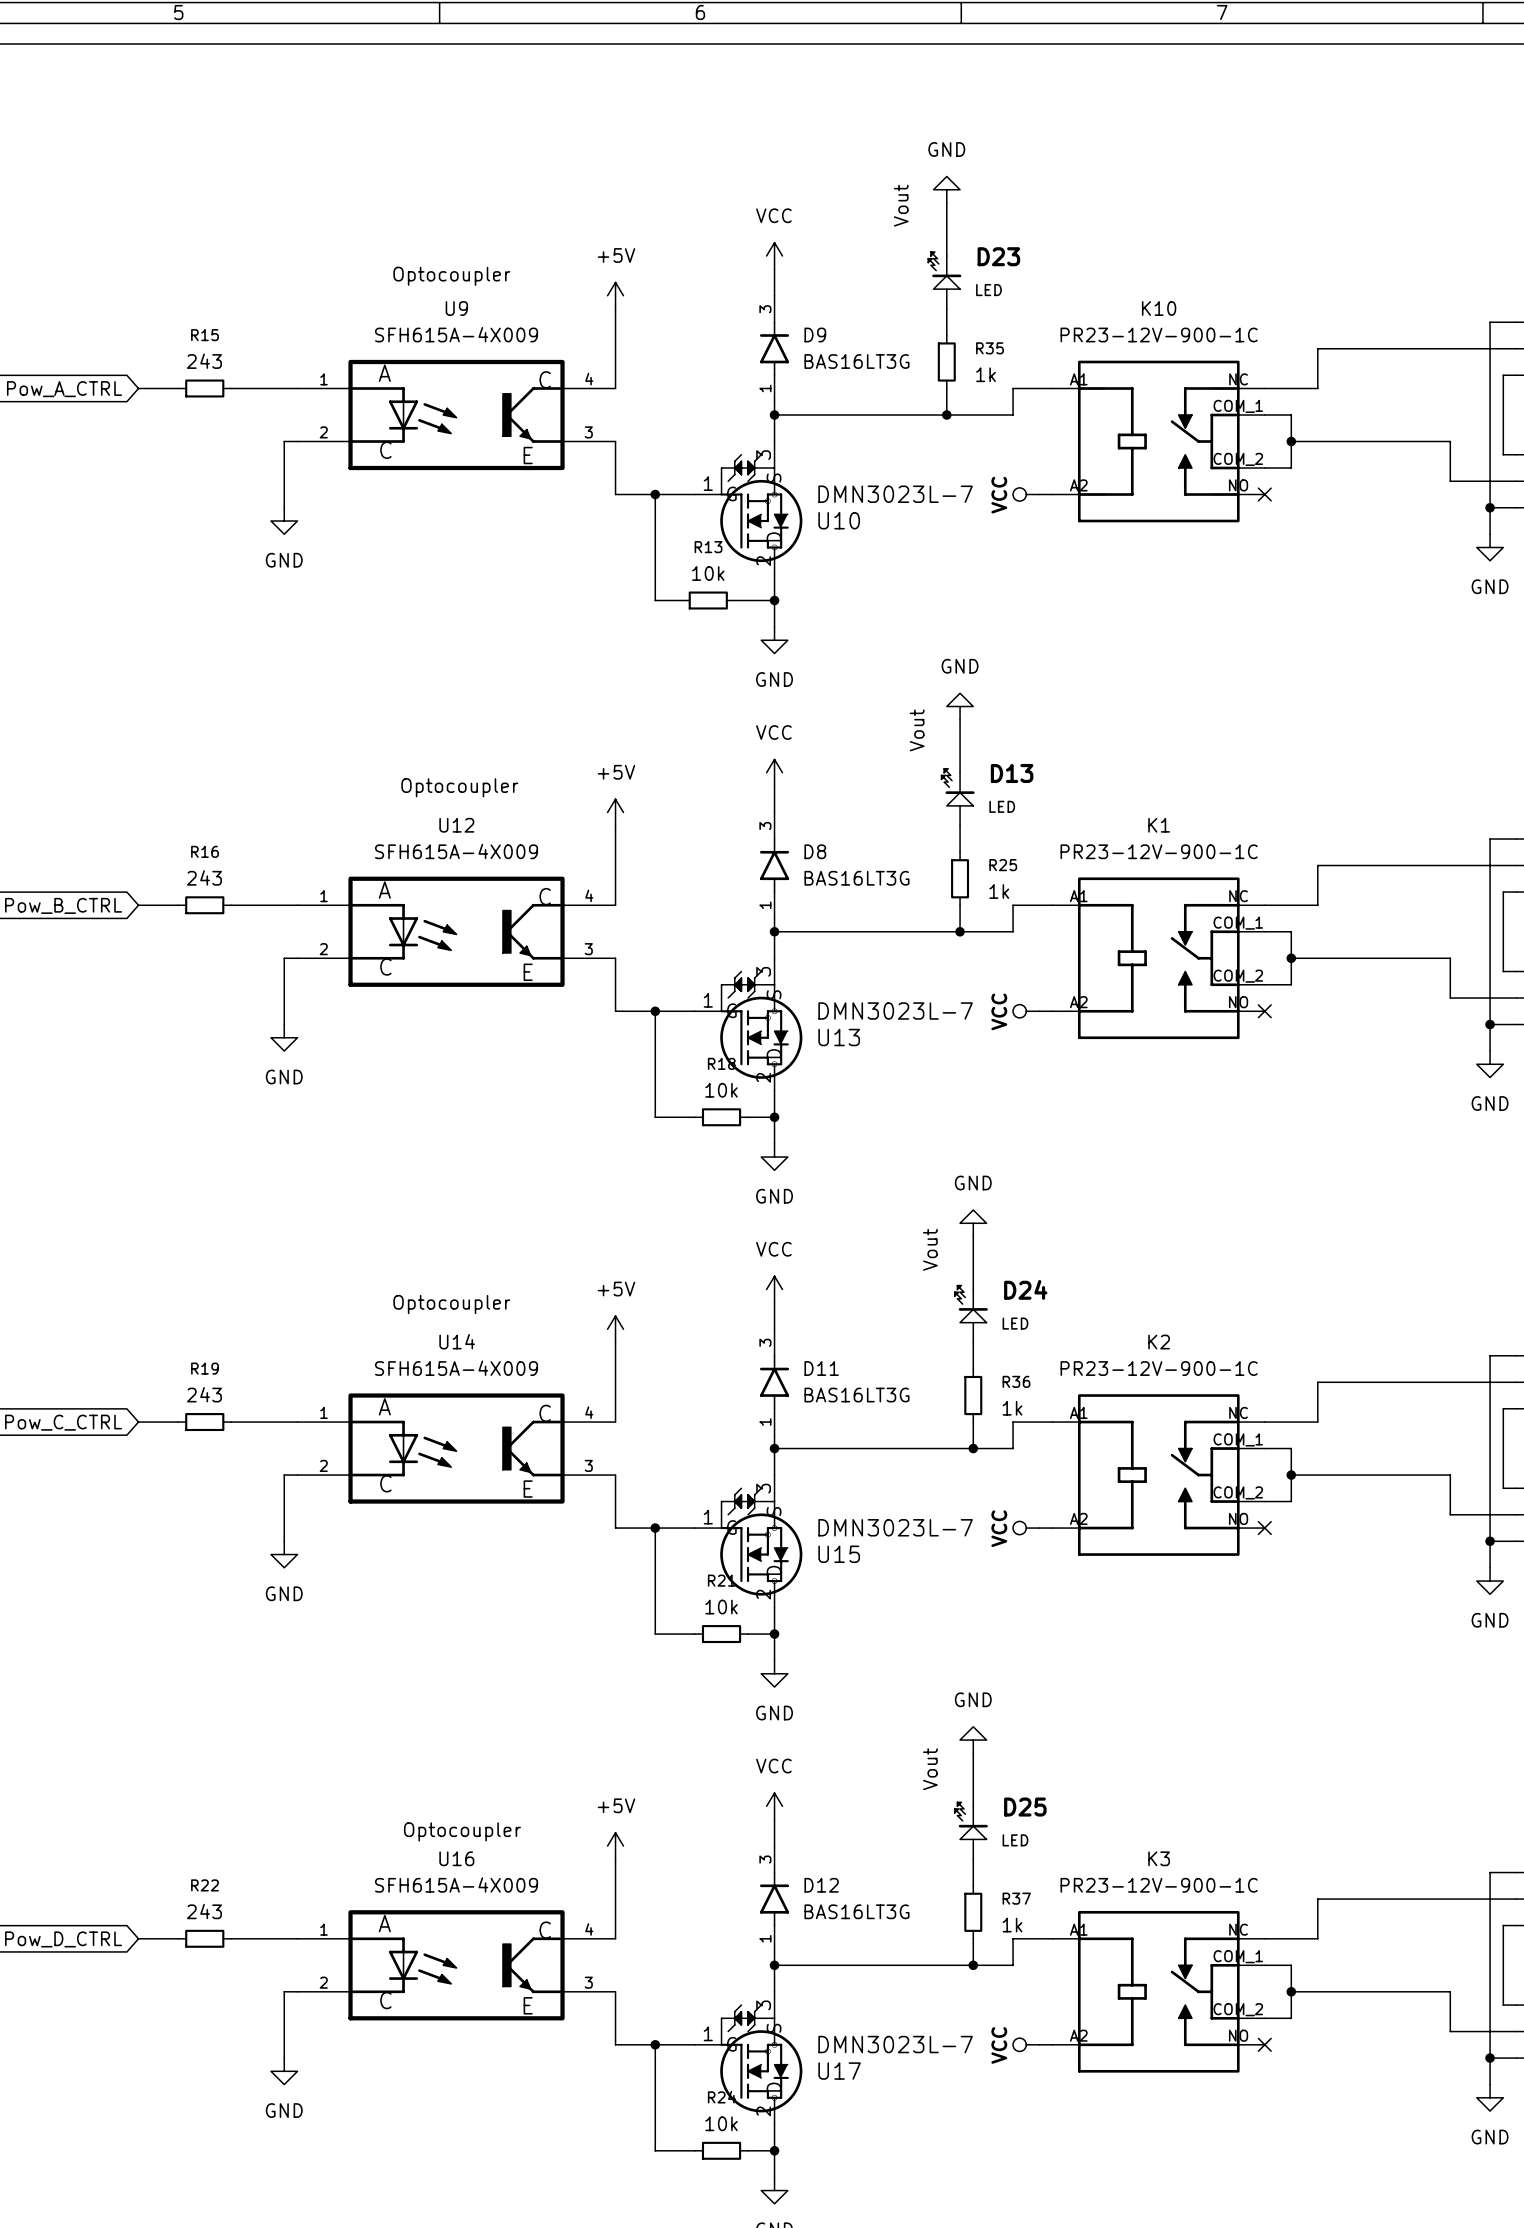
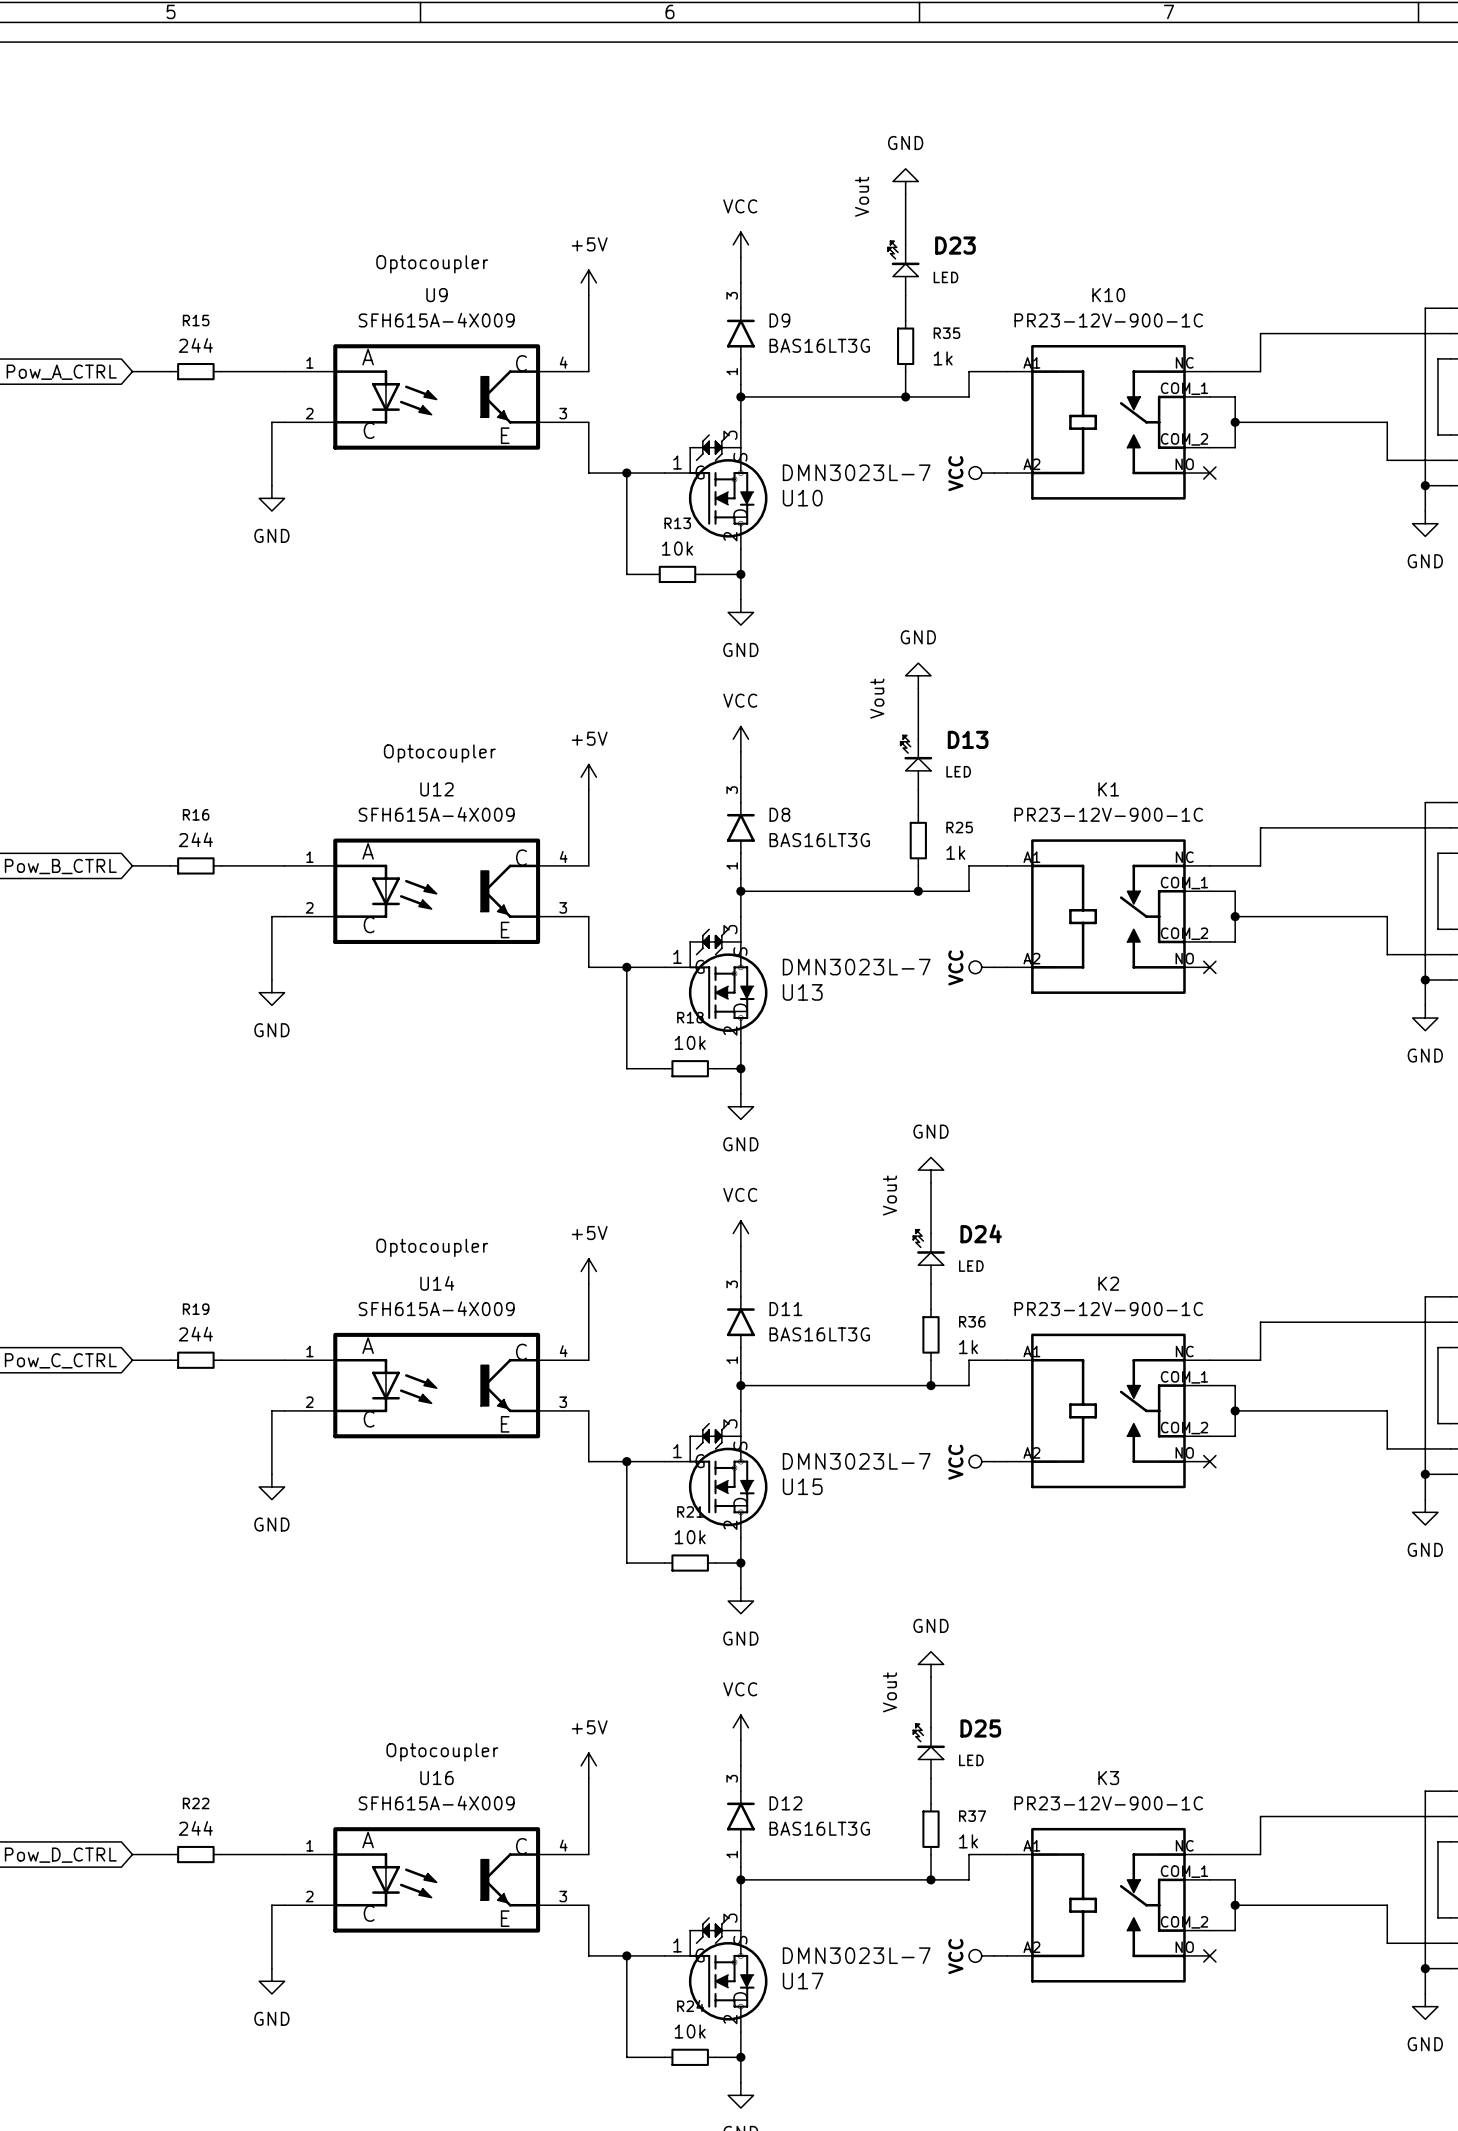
R15 value: 243 (204, 361) -> 244 (195, 345)
R16 value: 243 (204, 877) -> 244 (195, 839)
R19 value: 243 (204, 1394) -> 244 (195, 1334)
R22 value: 243 (204, 1911) -> 244 (195, 1828)

